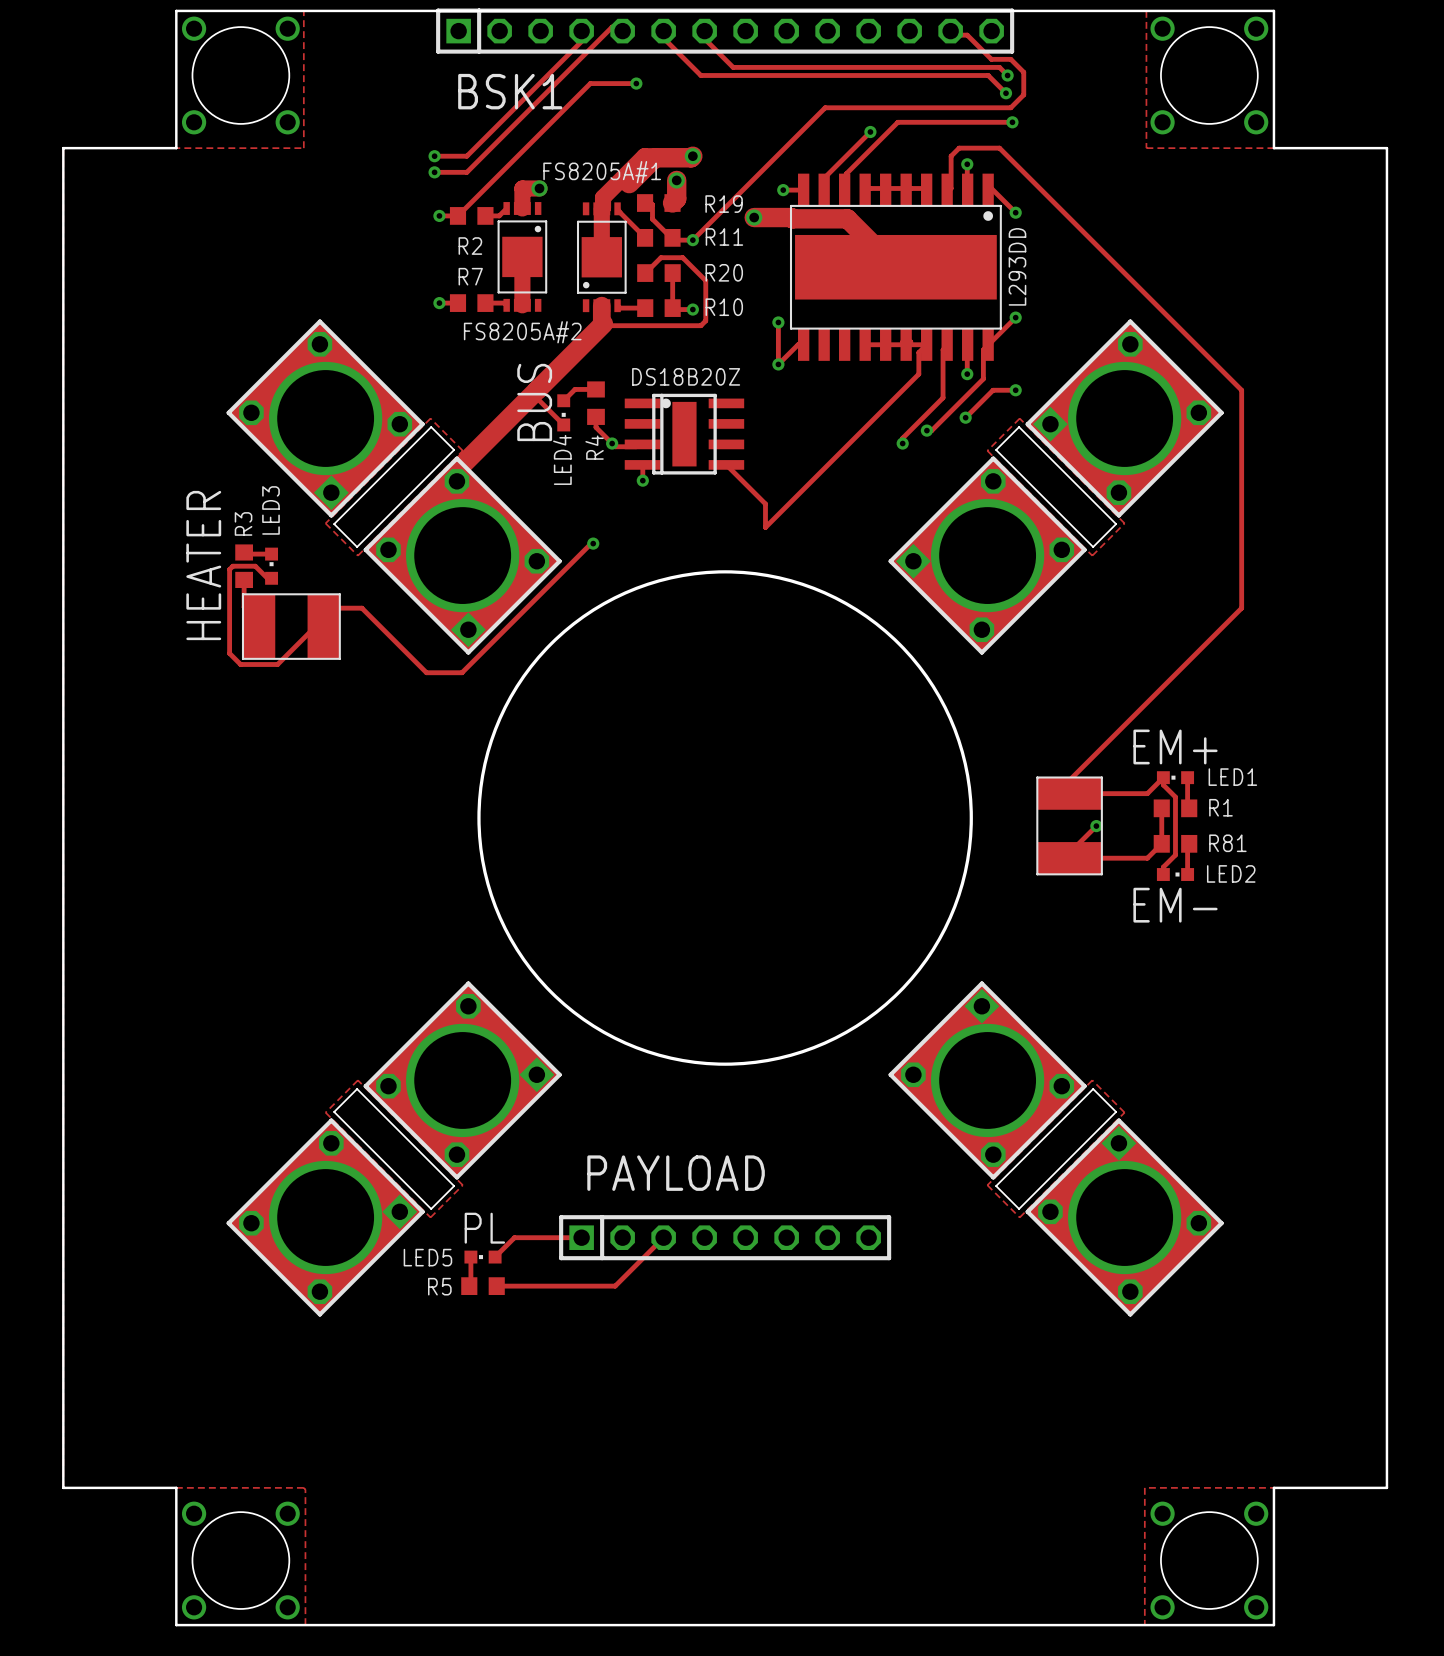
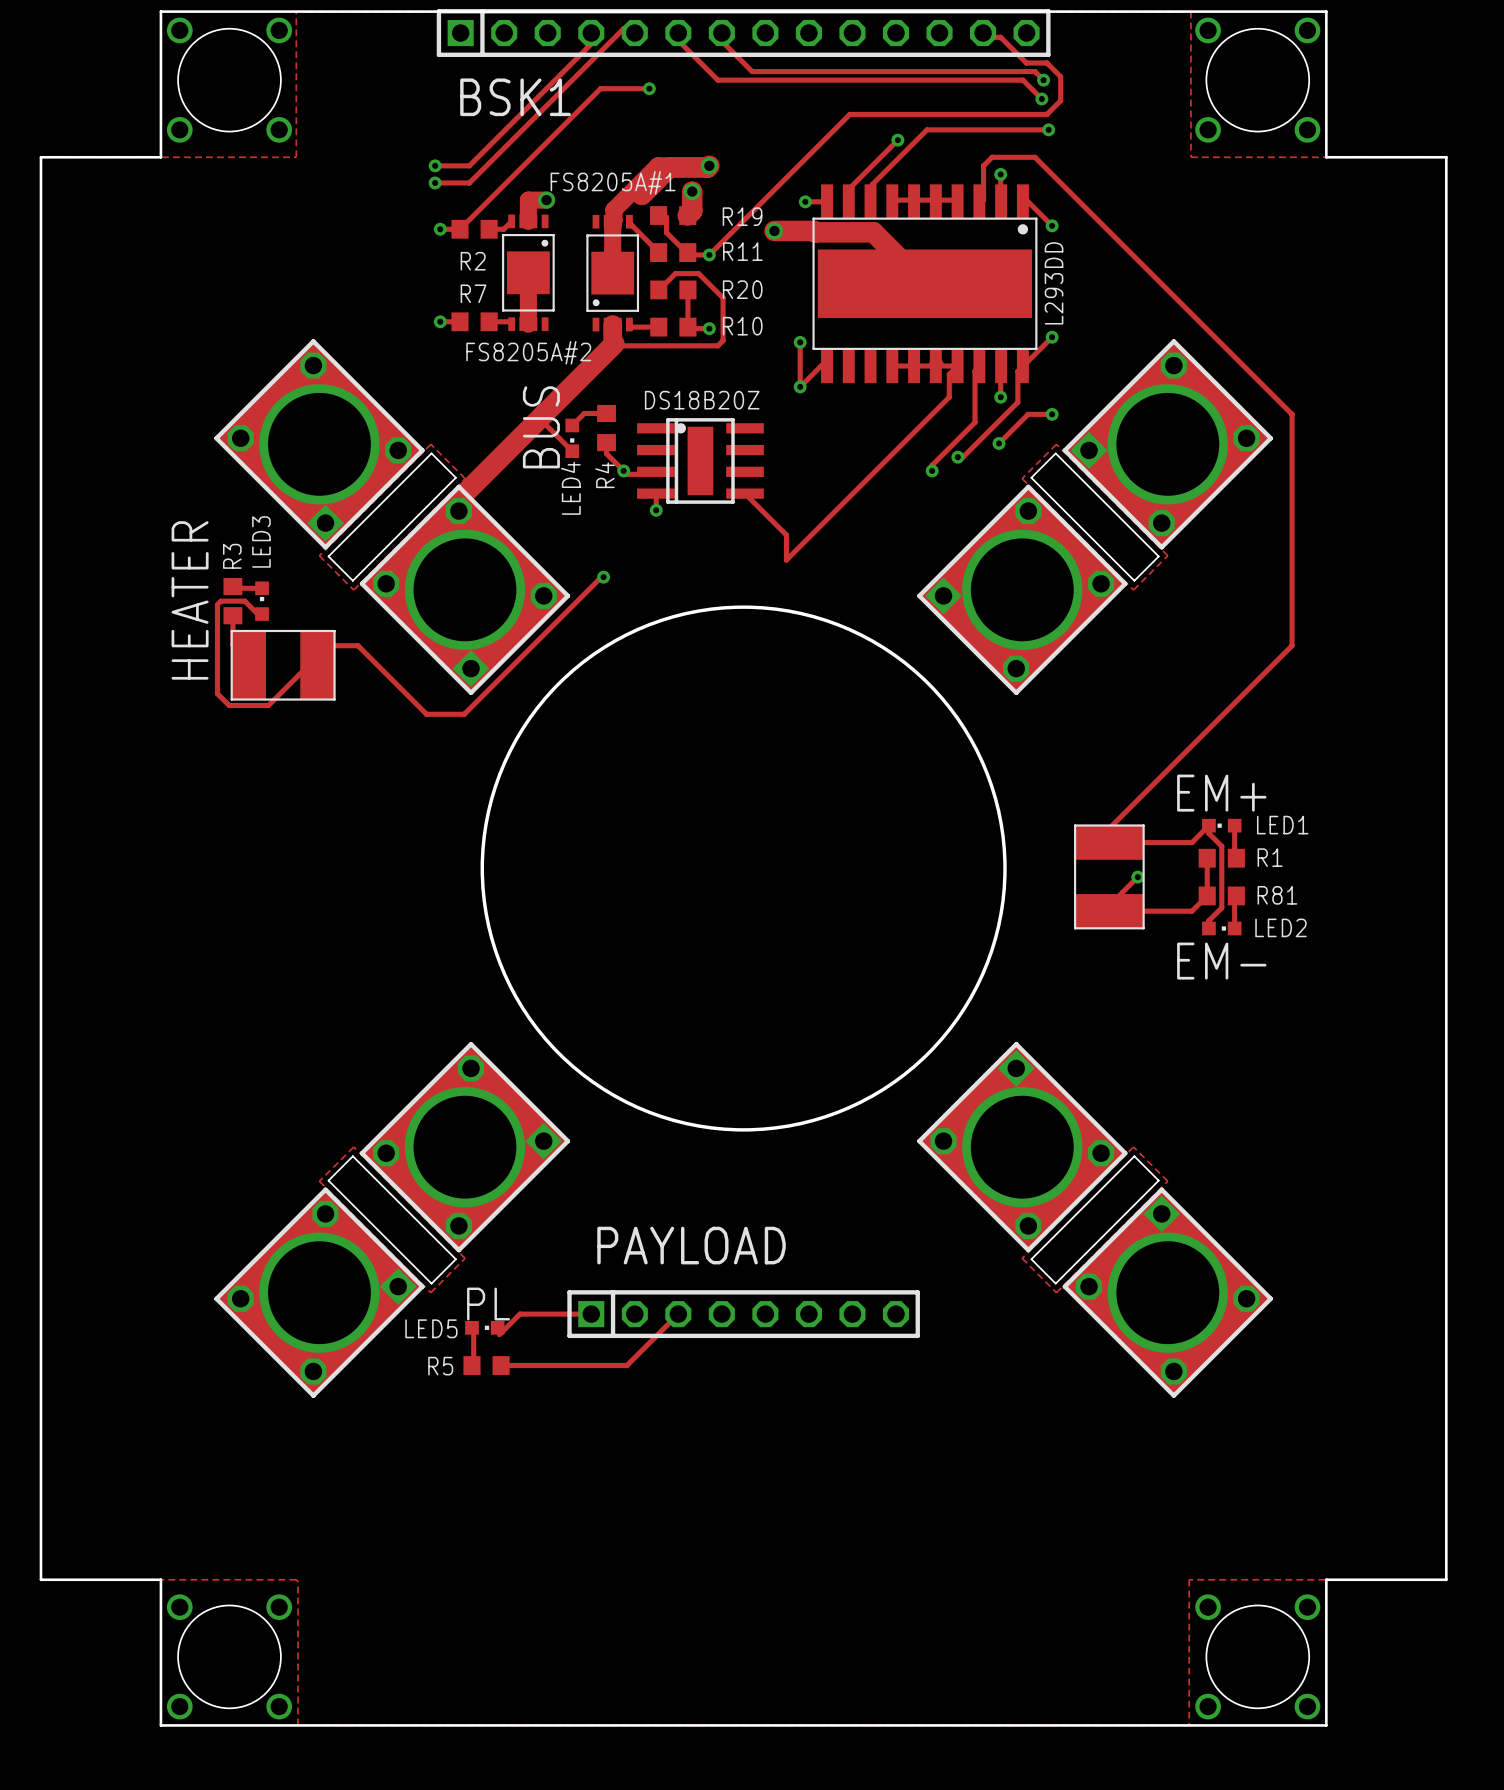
LED5 rotation: 0° (483, 1257) -> 180° (484, 1327)

